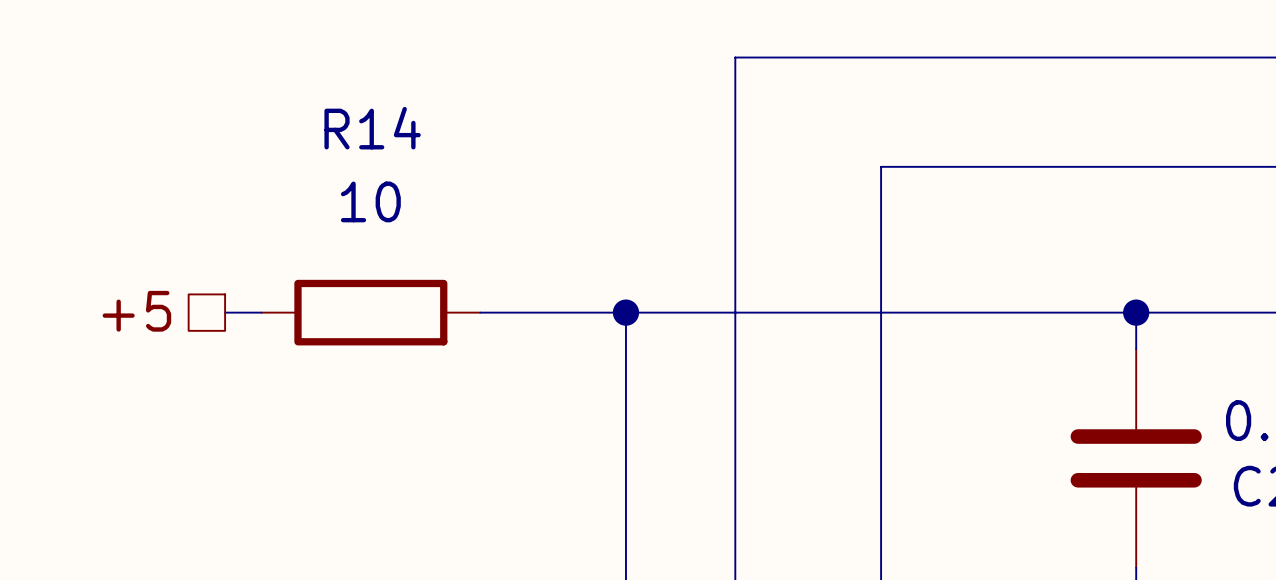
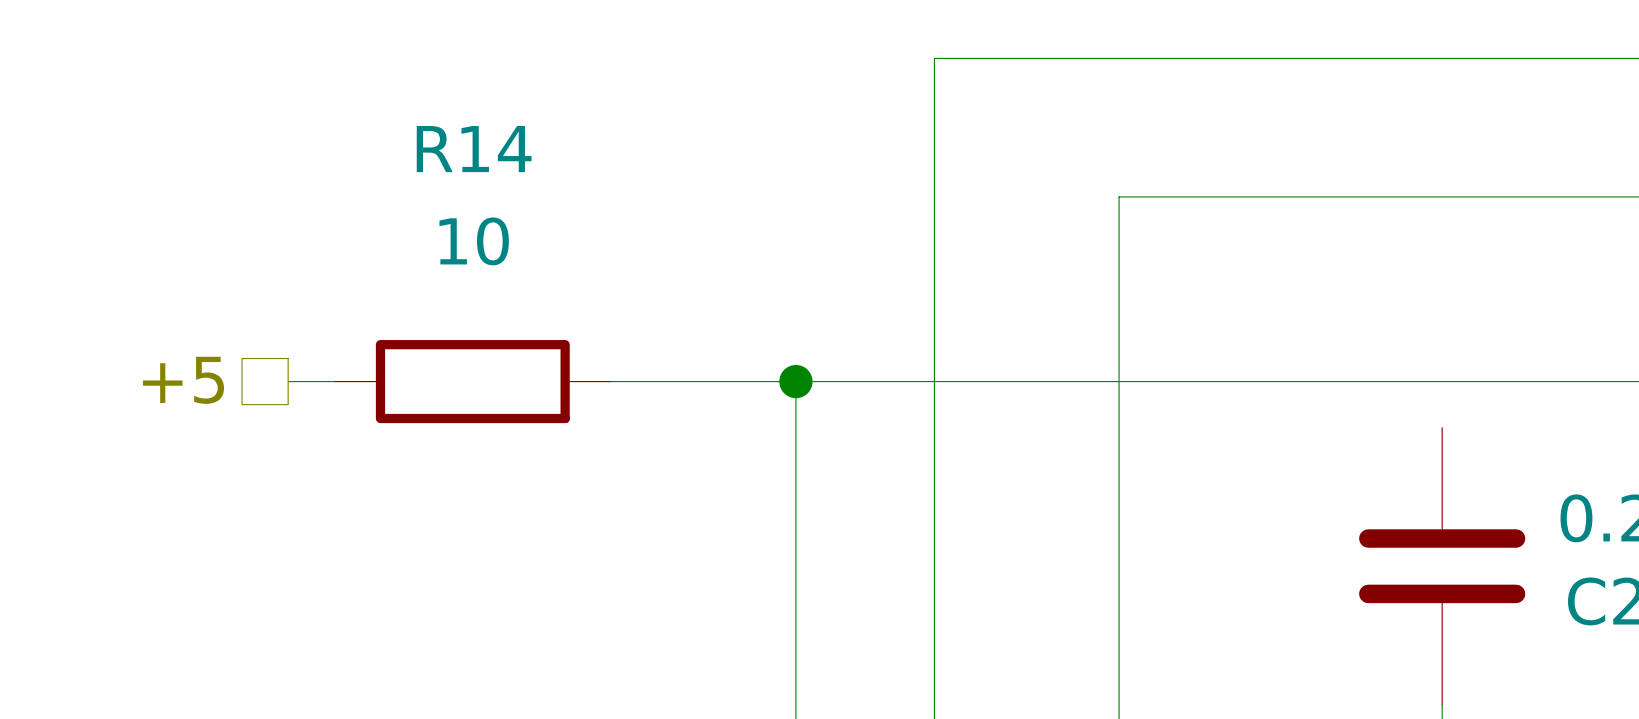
wire: (1136, 312) (1136, 349) -> none
junction: (1136, 312) -> none

